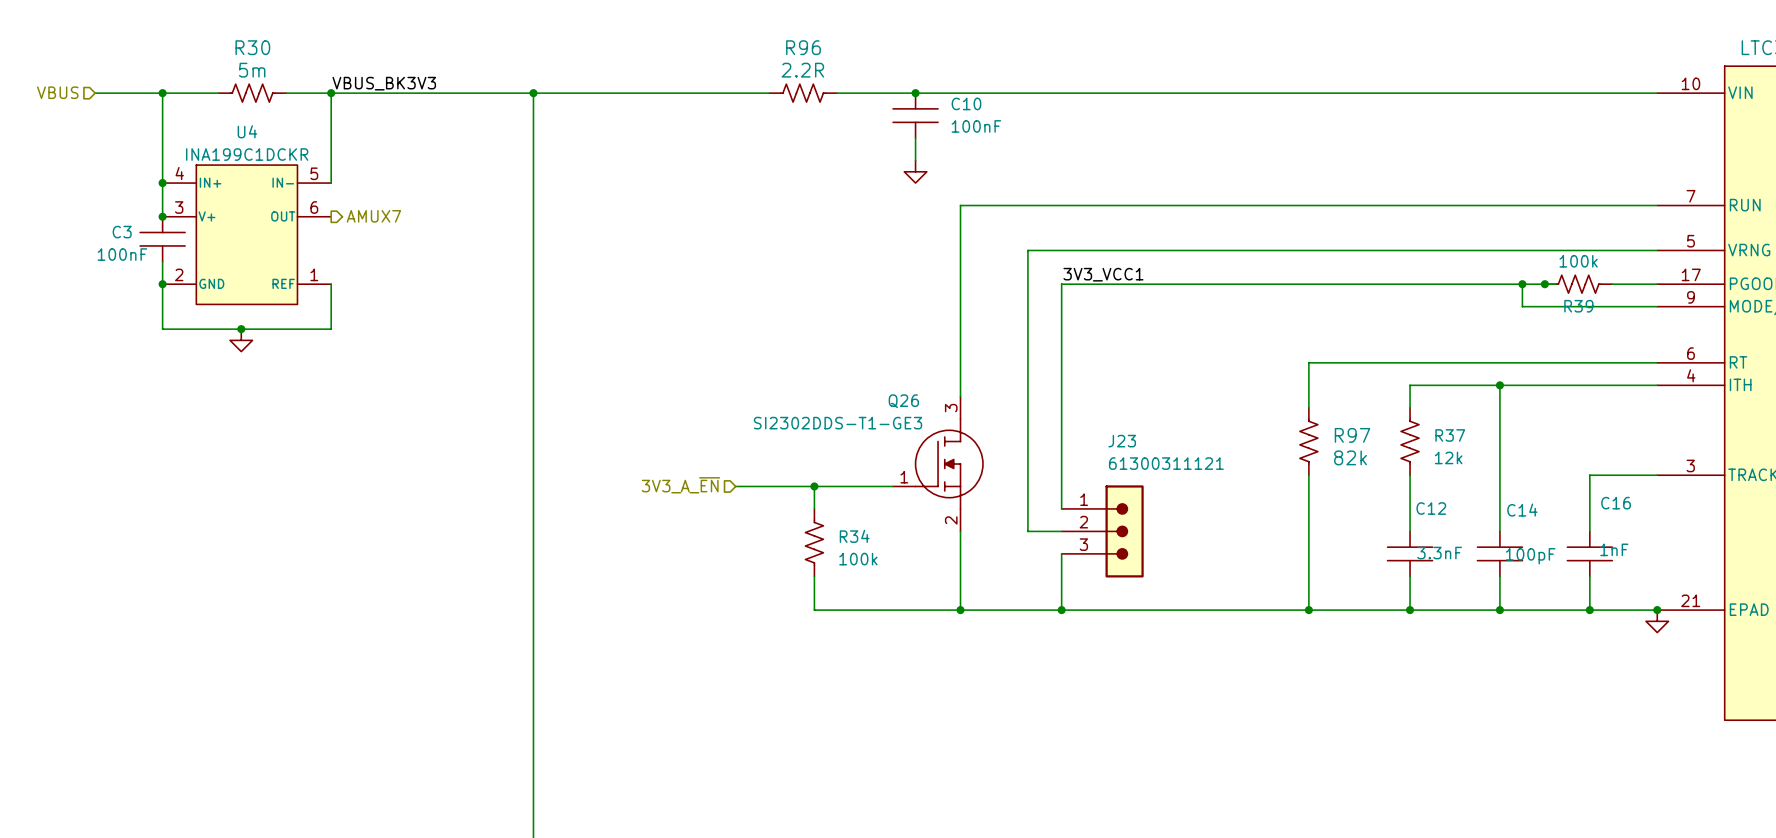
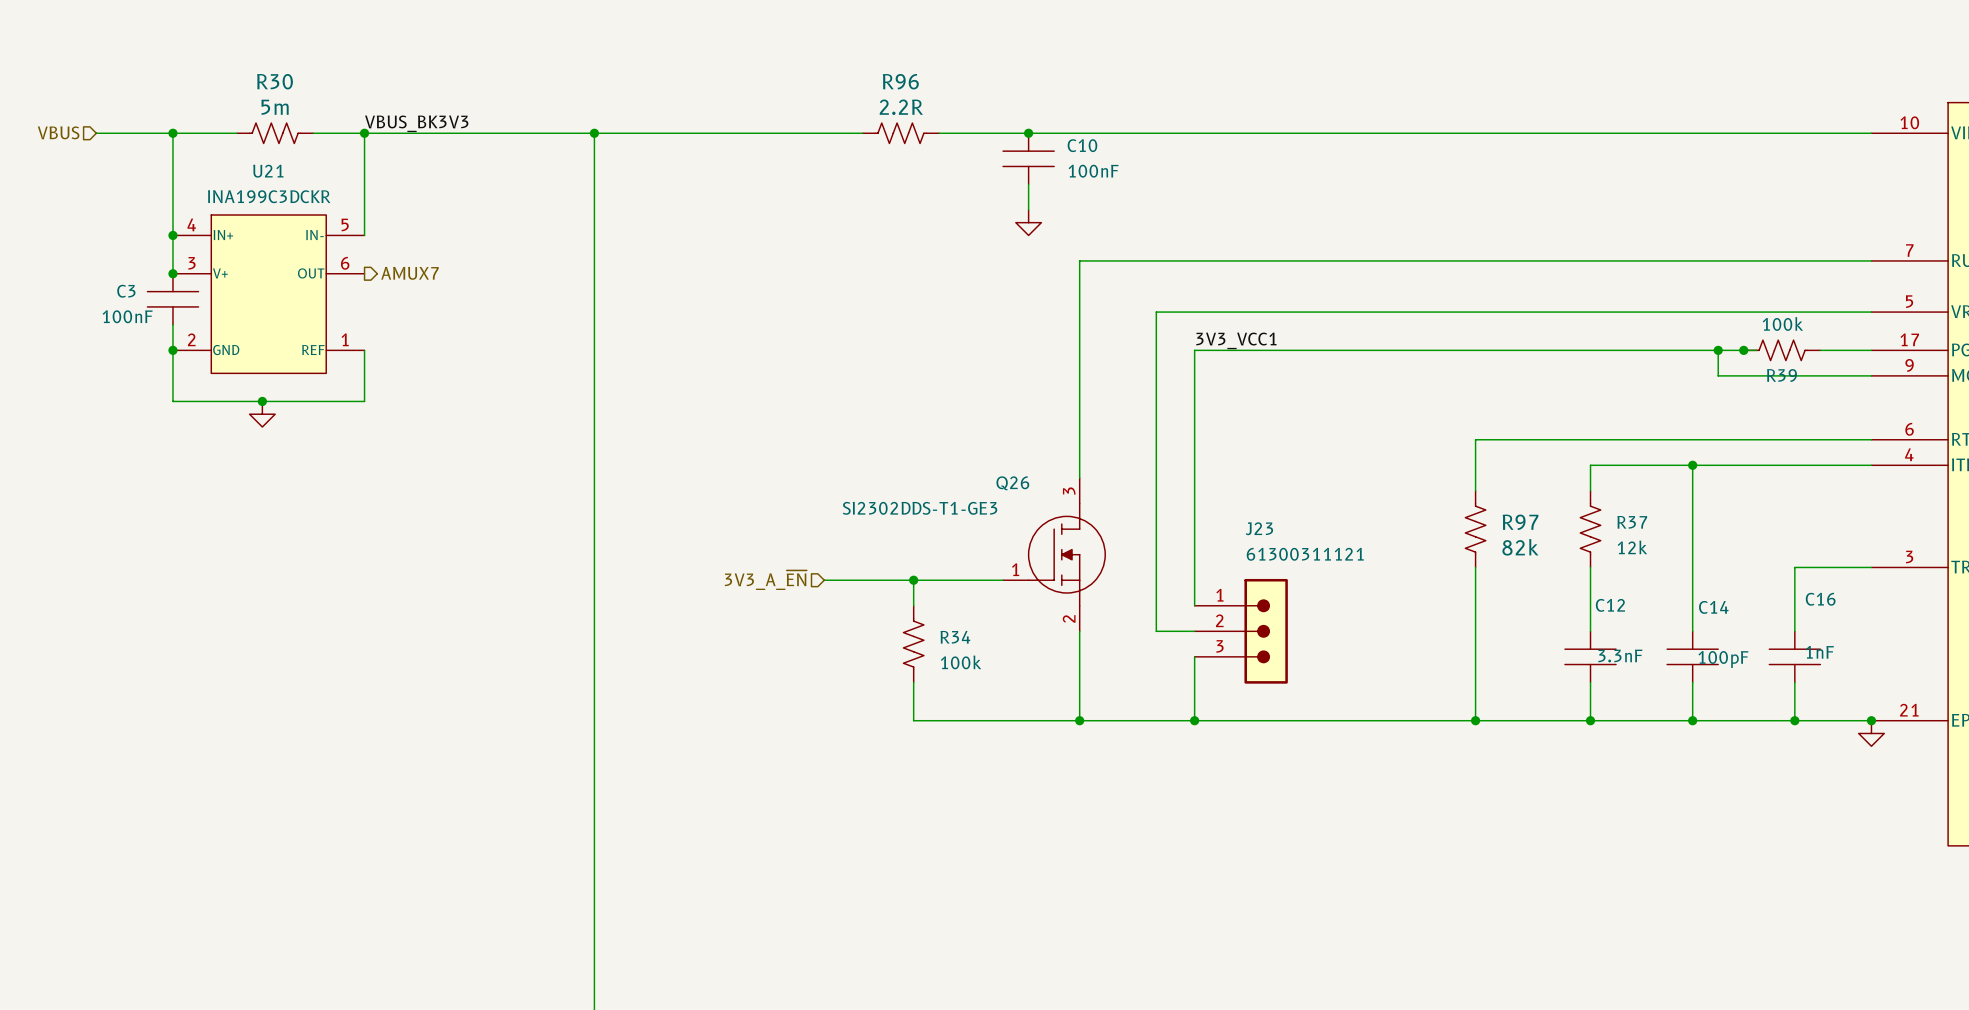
U4 name: U4 (247, 131) -> U21 (268, 171)
U4 value: INA199C1DCKR (247, 154) -> INA199C3DCKR (269, 196)

